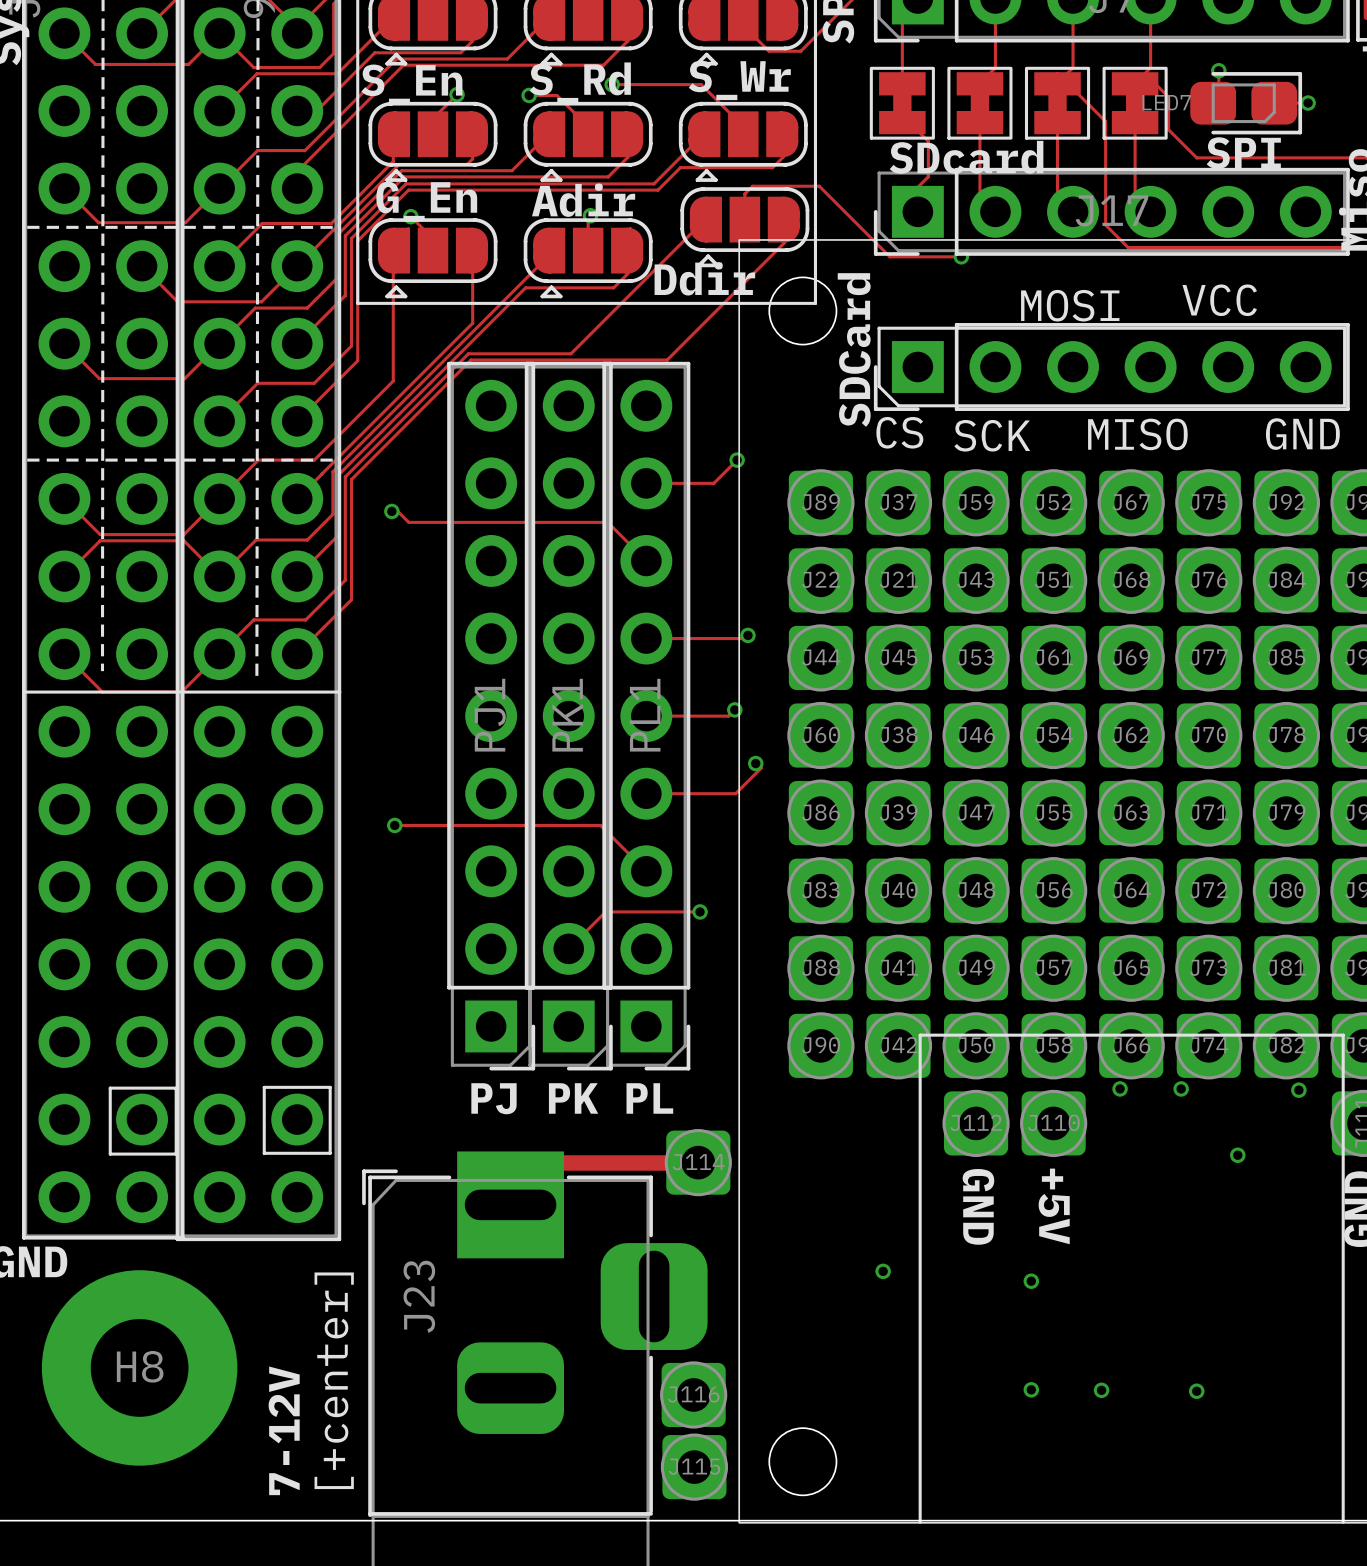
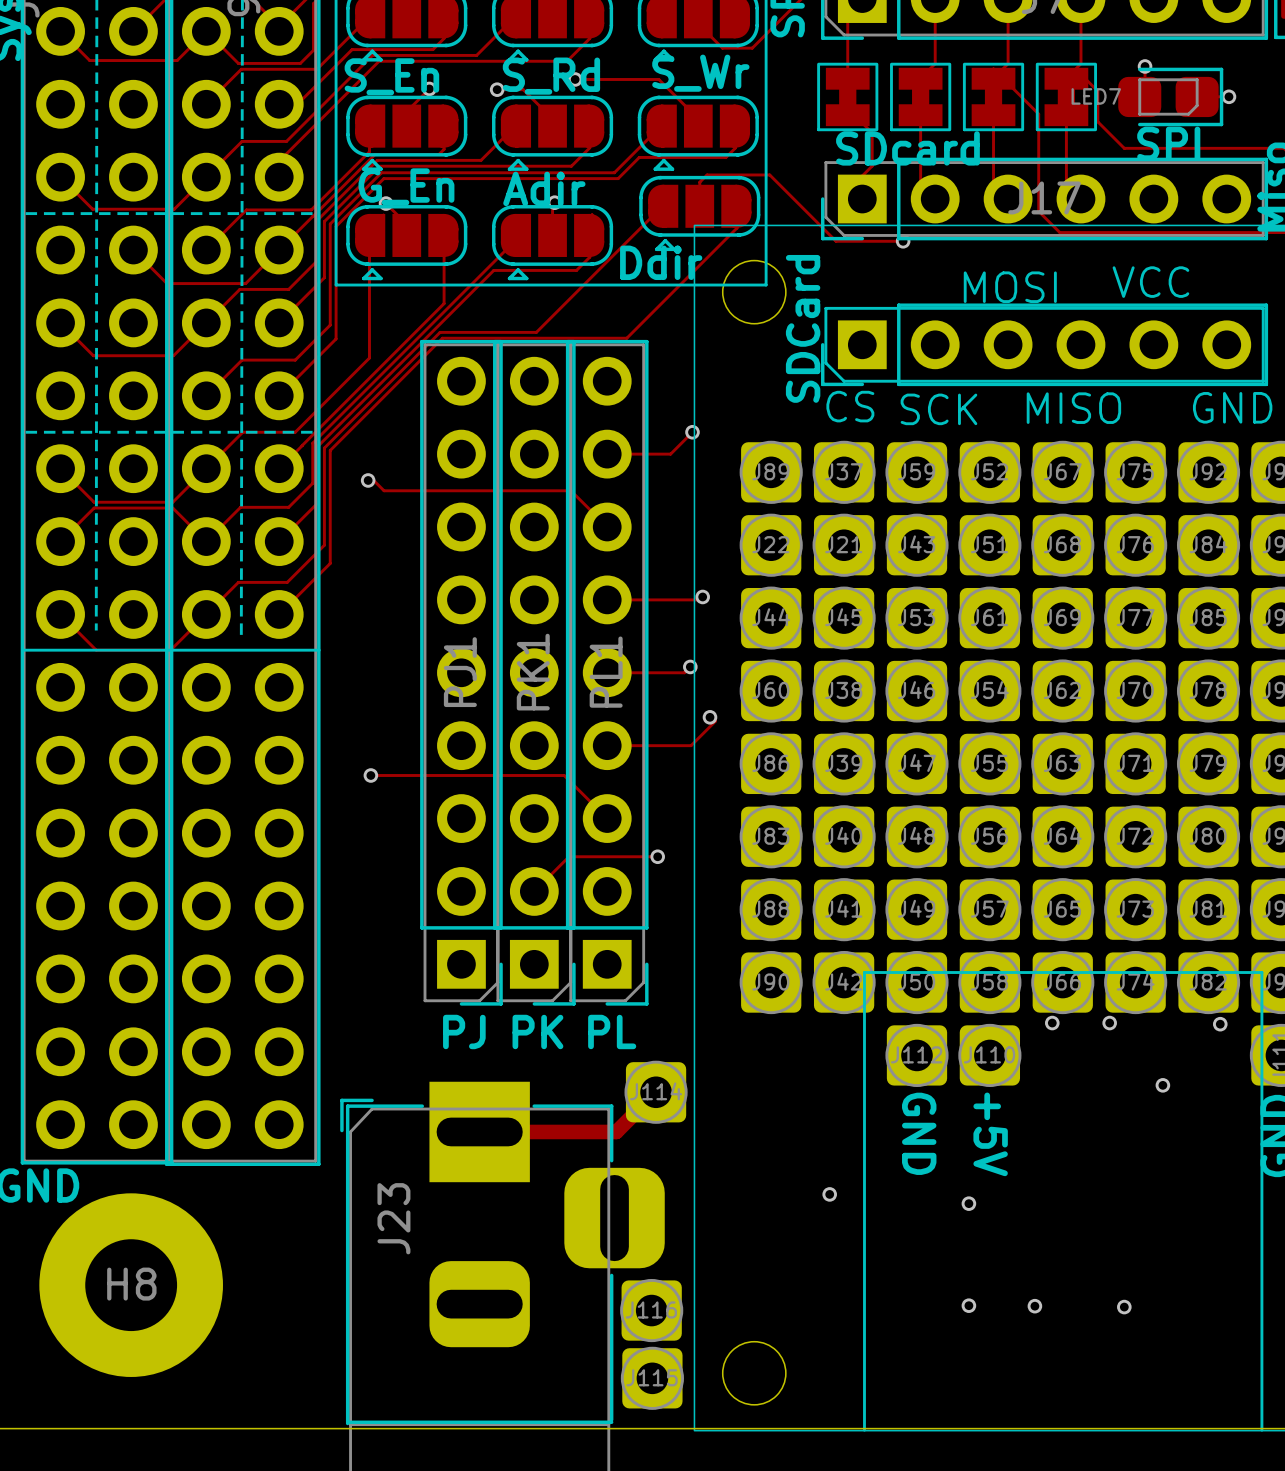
line: (264, 1087) (330, 1087) (330, 1153) (264, 1153) (264, 1087) -> none
line: (110, 1088) (176, 1088) (176, 1154) (110, 1154) (110, 1088) -> none
track: (697, 1162) (552, 1162) (510, 1204) -> (656, 1092) (616, 1131) (479, 1131)
text: [+center] (334, 1380) -> none
text: 7-12V (284, 1430) -> none

